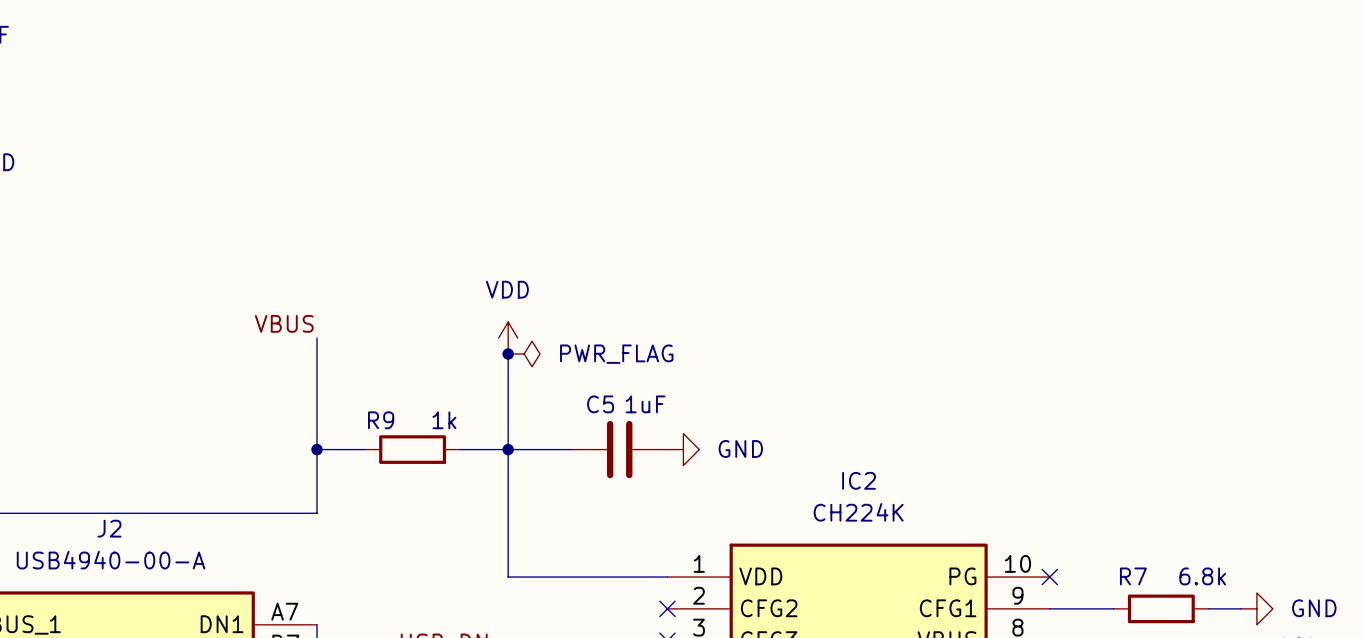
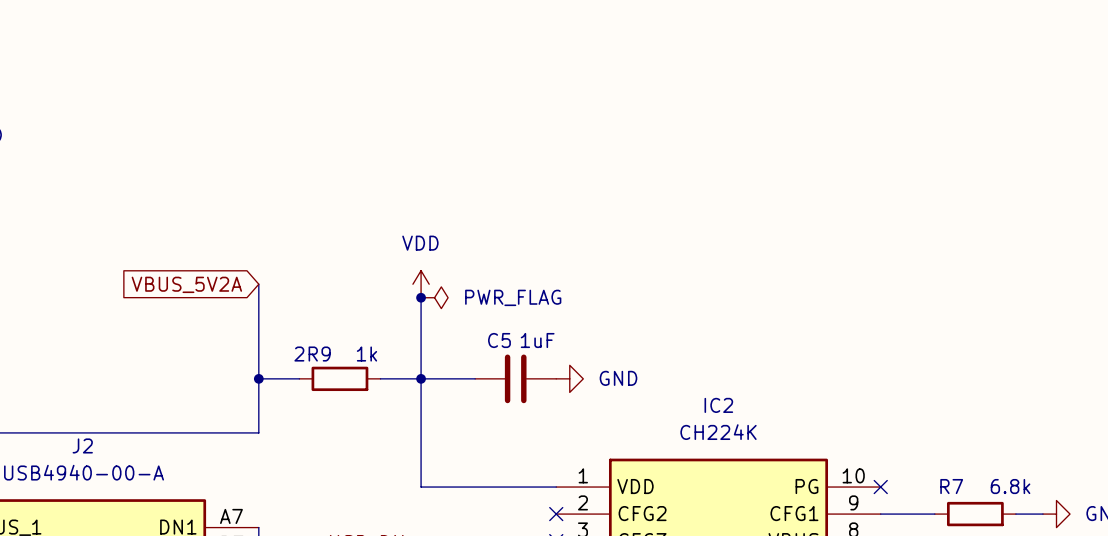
label: VBUS (284, 323) -> none
global label: none -> VBUS_5V2A (186, 284)
R9 name: R9 (381, 420) -> 2R9 (312, 354)

